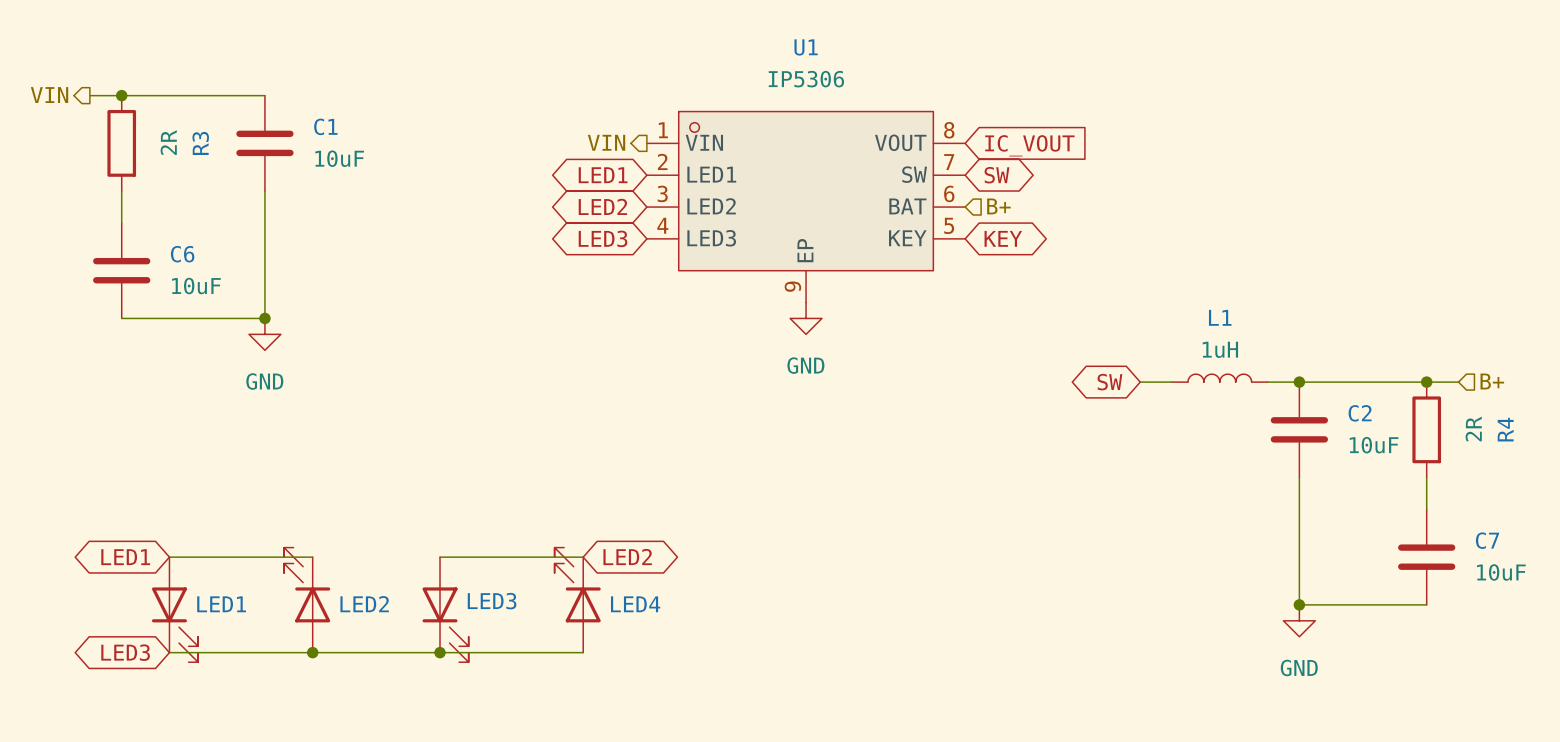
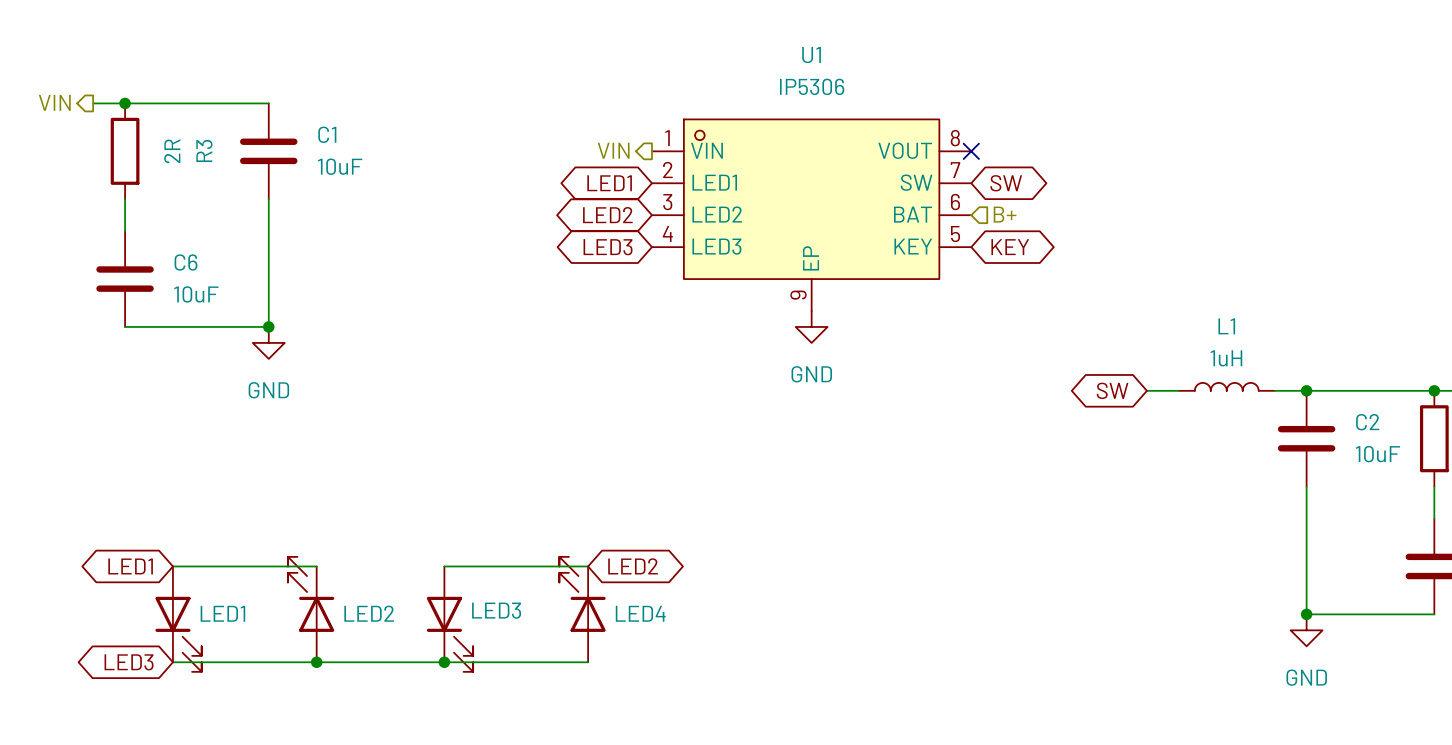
no-connect mark: none -> (971, 151)
global label: IC_VOUT (1029, 145) -> none

